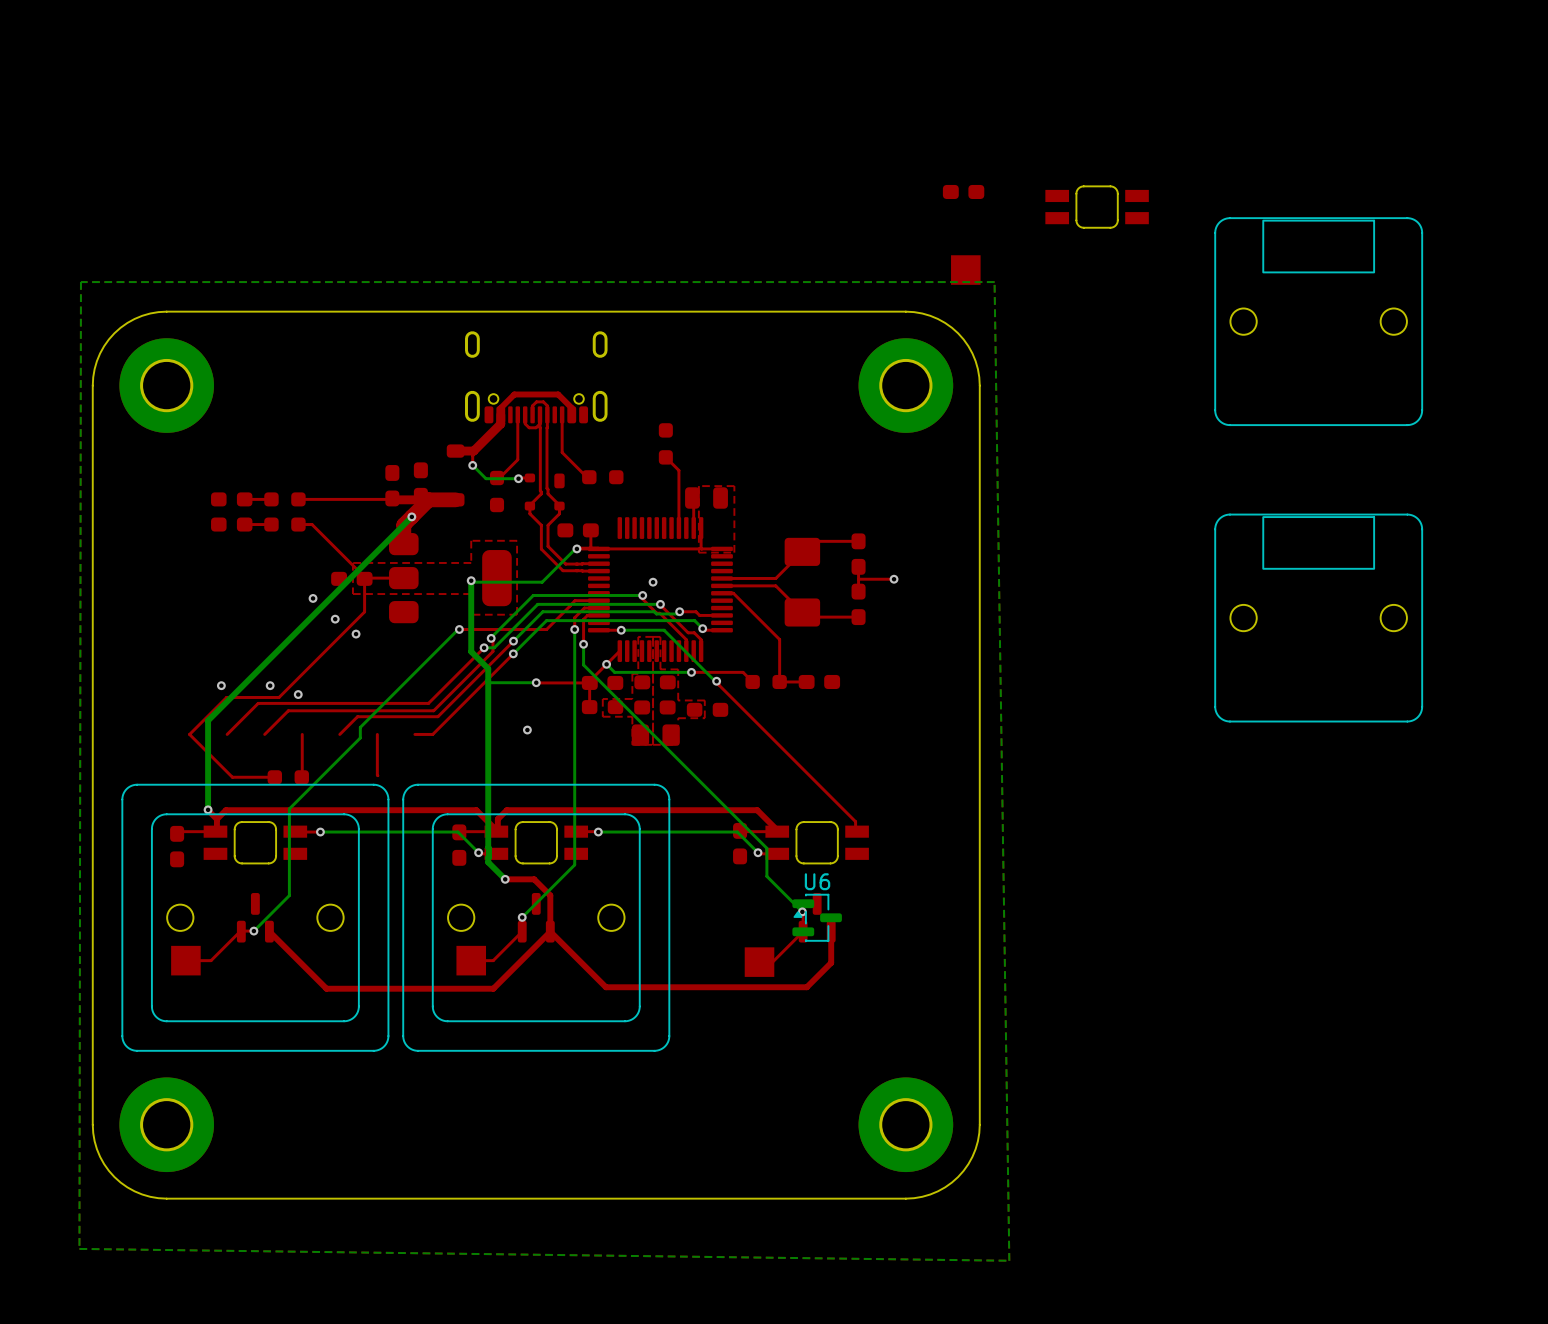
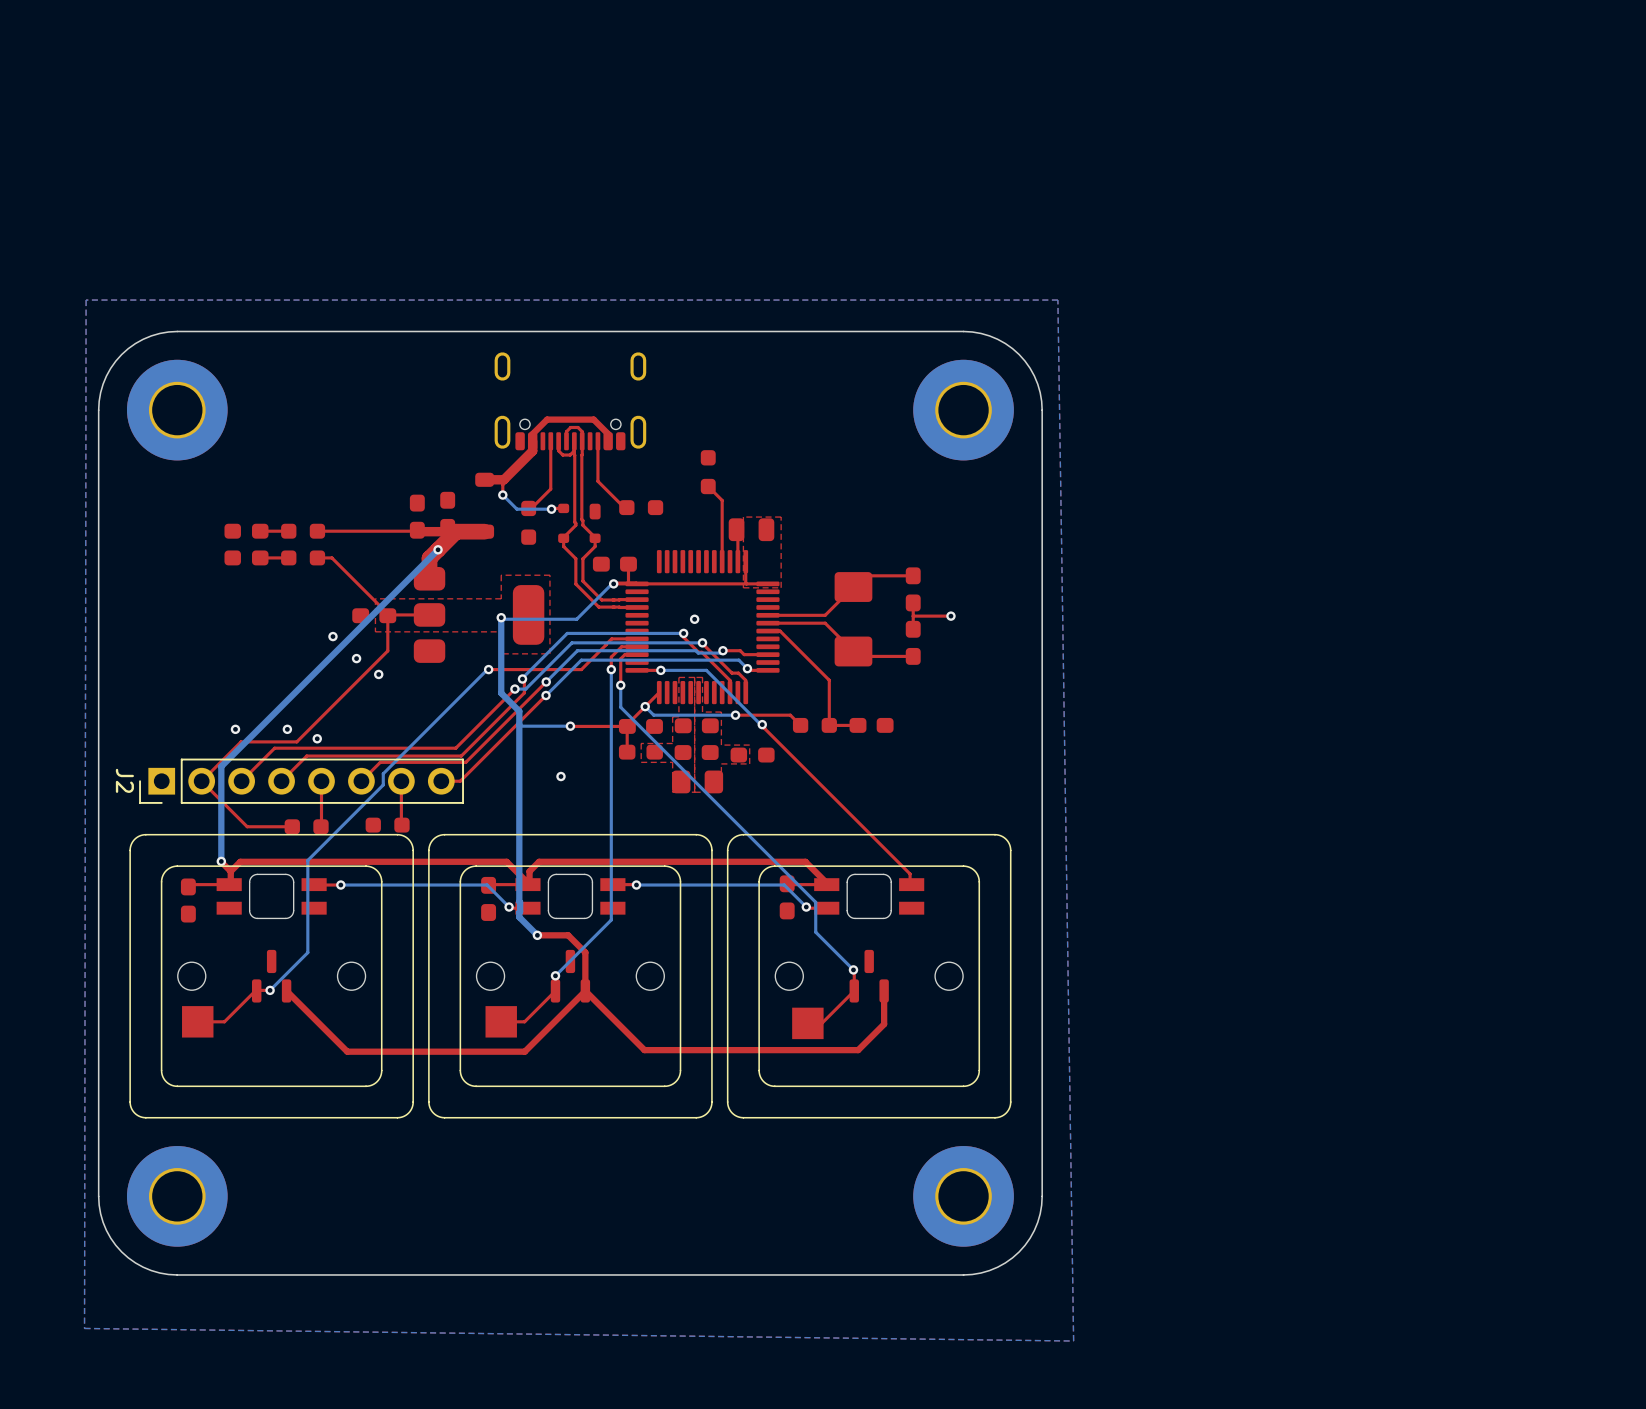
part: (963, 191) -> none
part: (1097, 207) -> none
drawing: [1214, 217, 1423, 426] -> none
part: (965, 270) -> none
drawing: [1214, 513, 1423, 723] -> none
J2: none -> (301, 781)
part: none -> (387, 825)
drawing: none -> [726, 833, 1012, 1119]
U6: (817, 917) -> none

